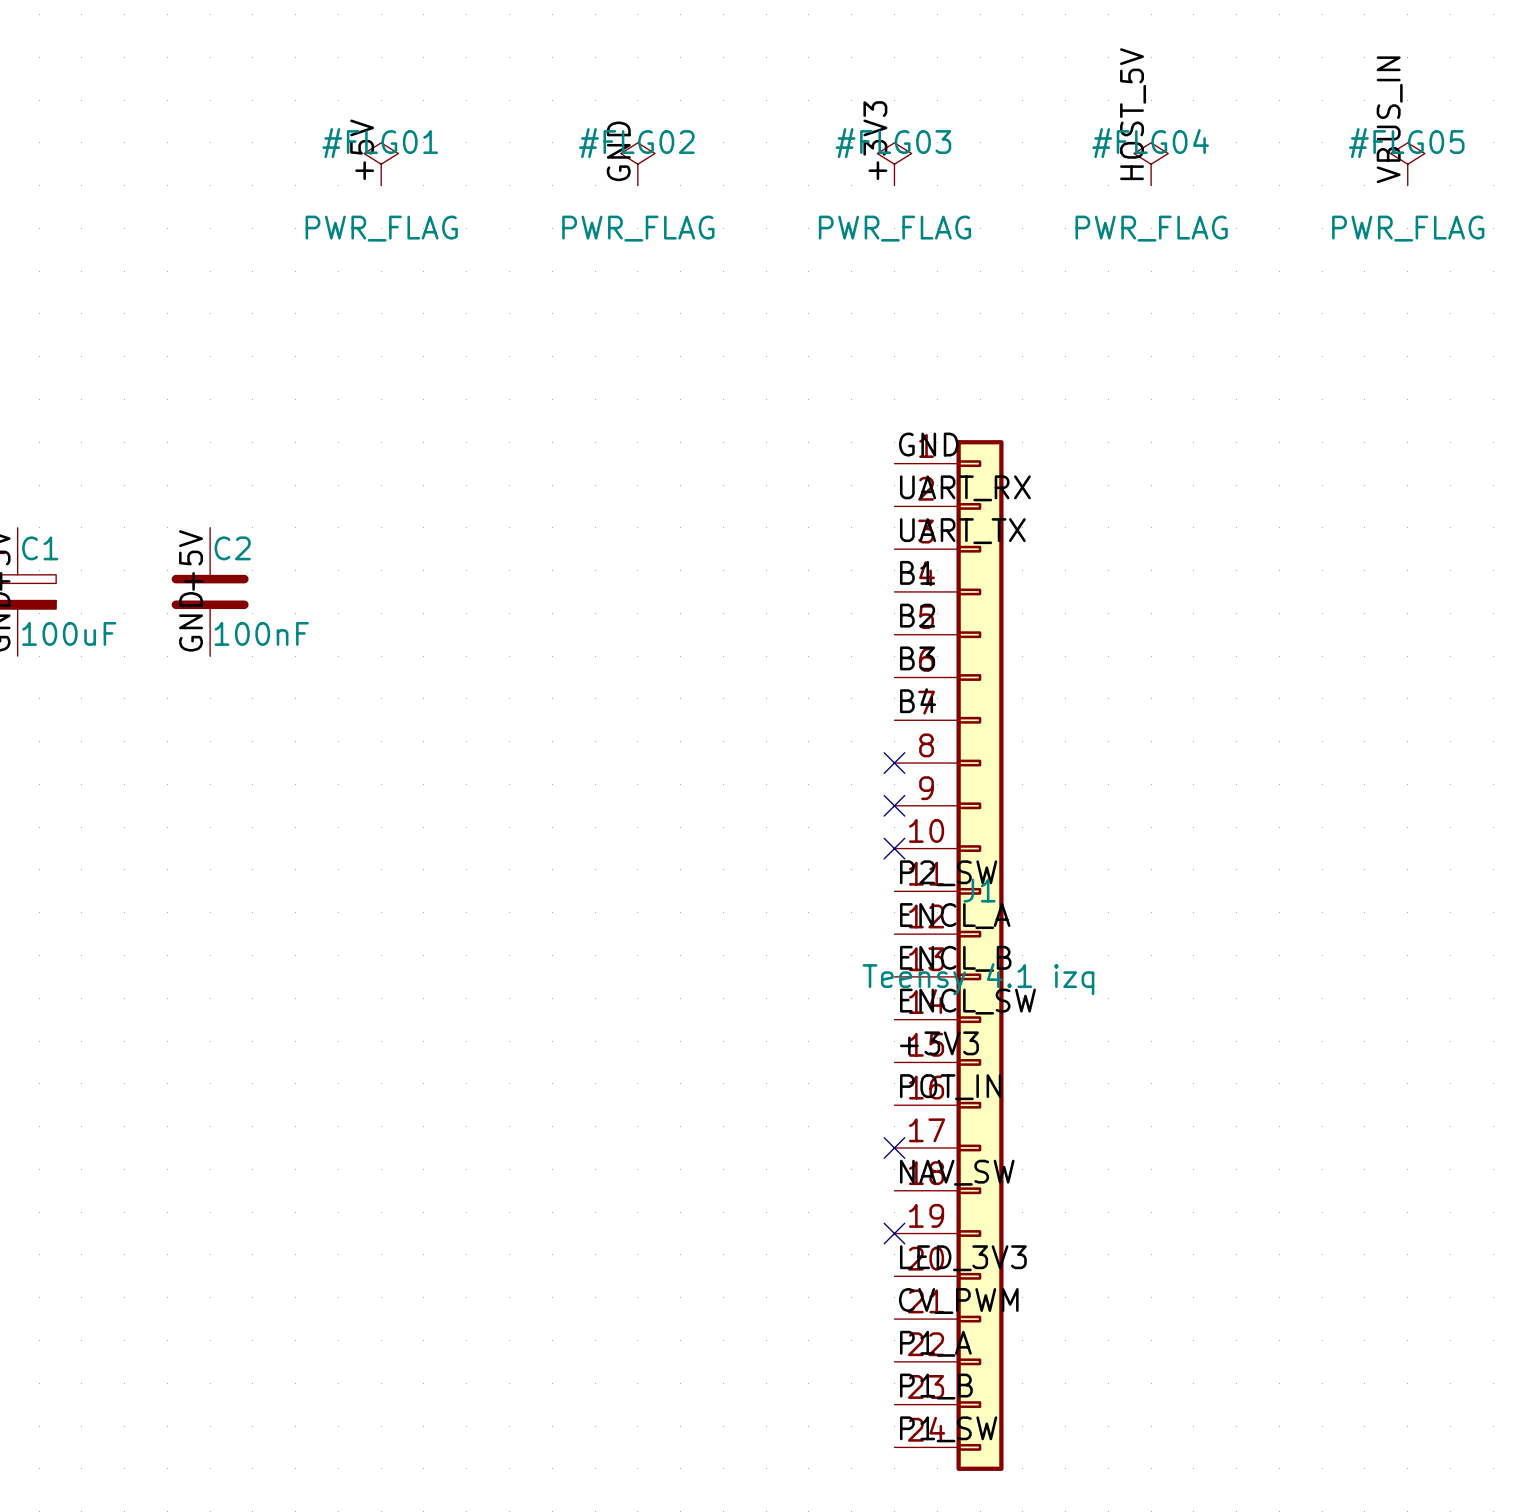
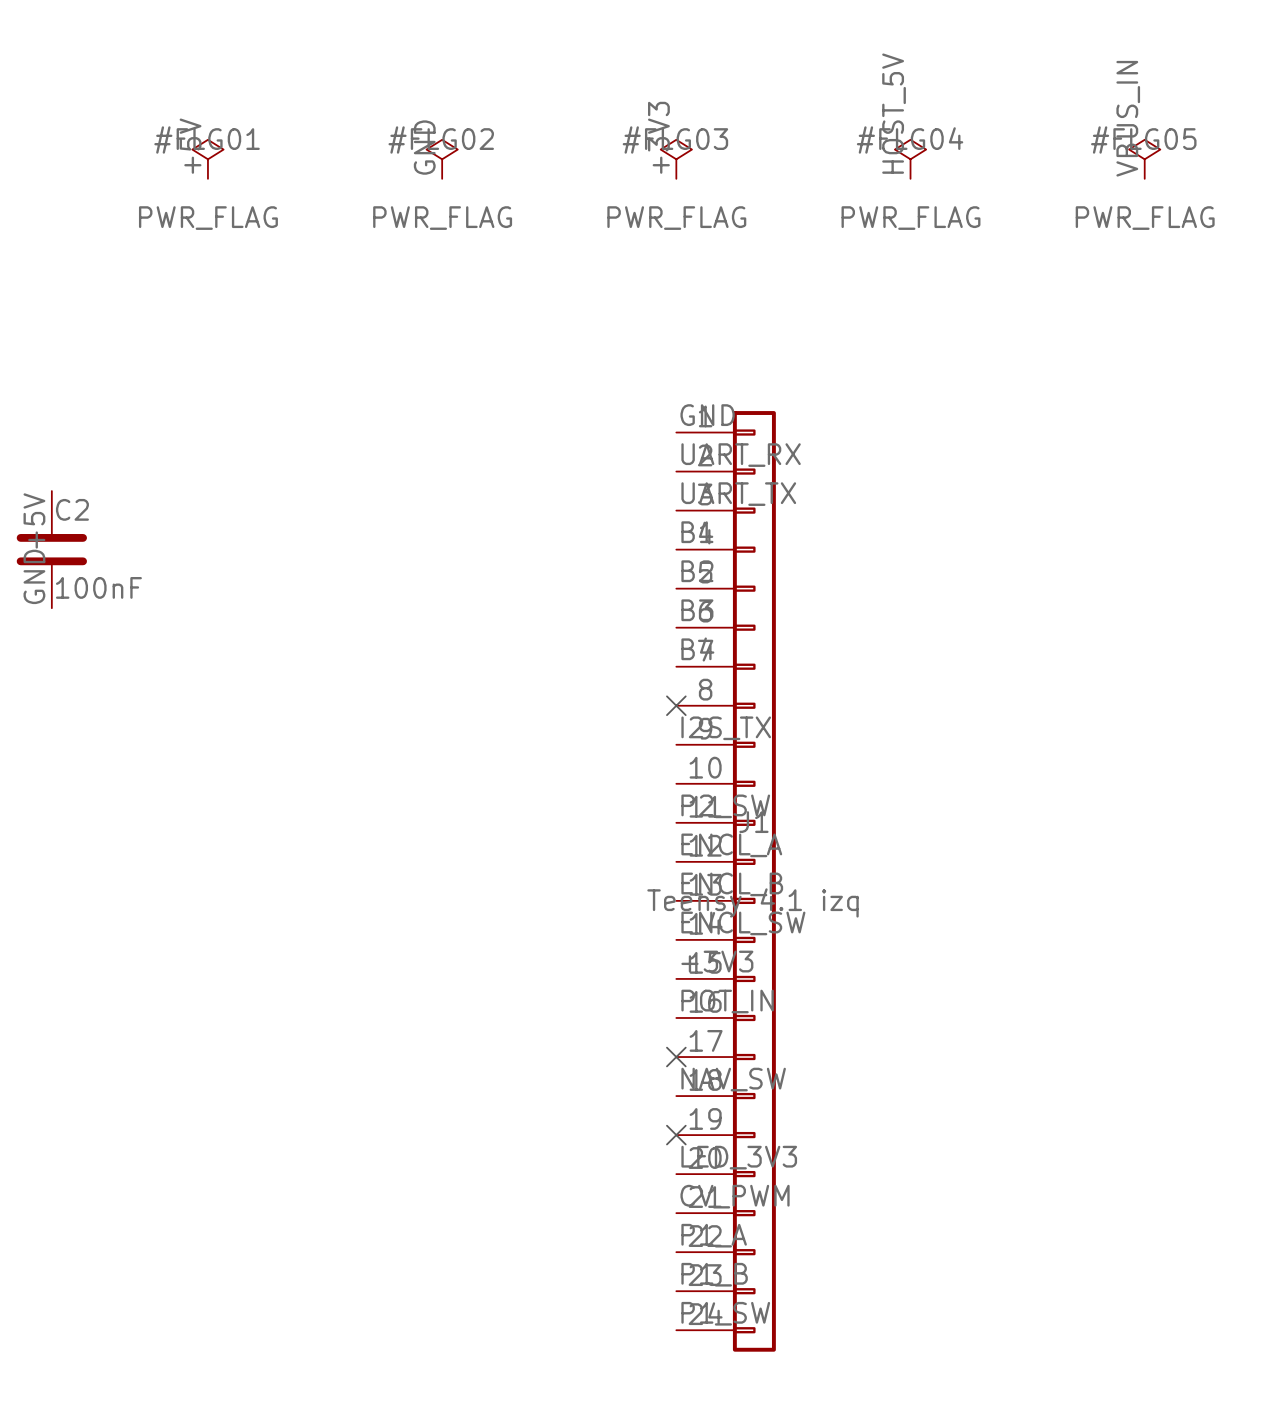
label: none -> I2S_TX (726, 728)
no-connect mark: (894, 805) -> none
no-connect mark: (894, 848) -> none

